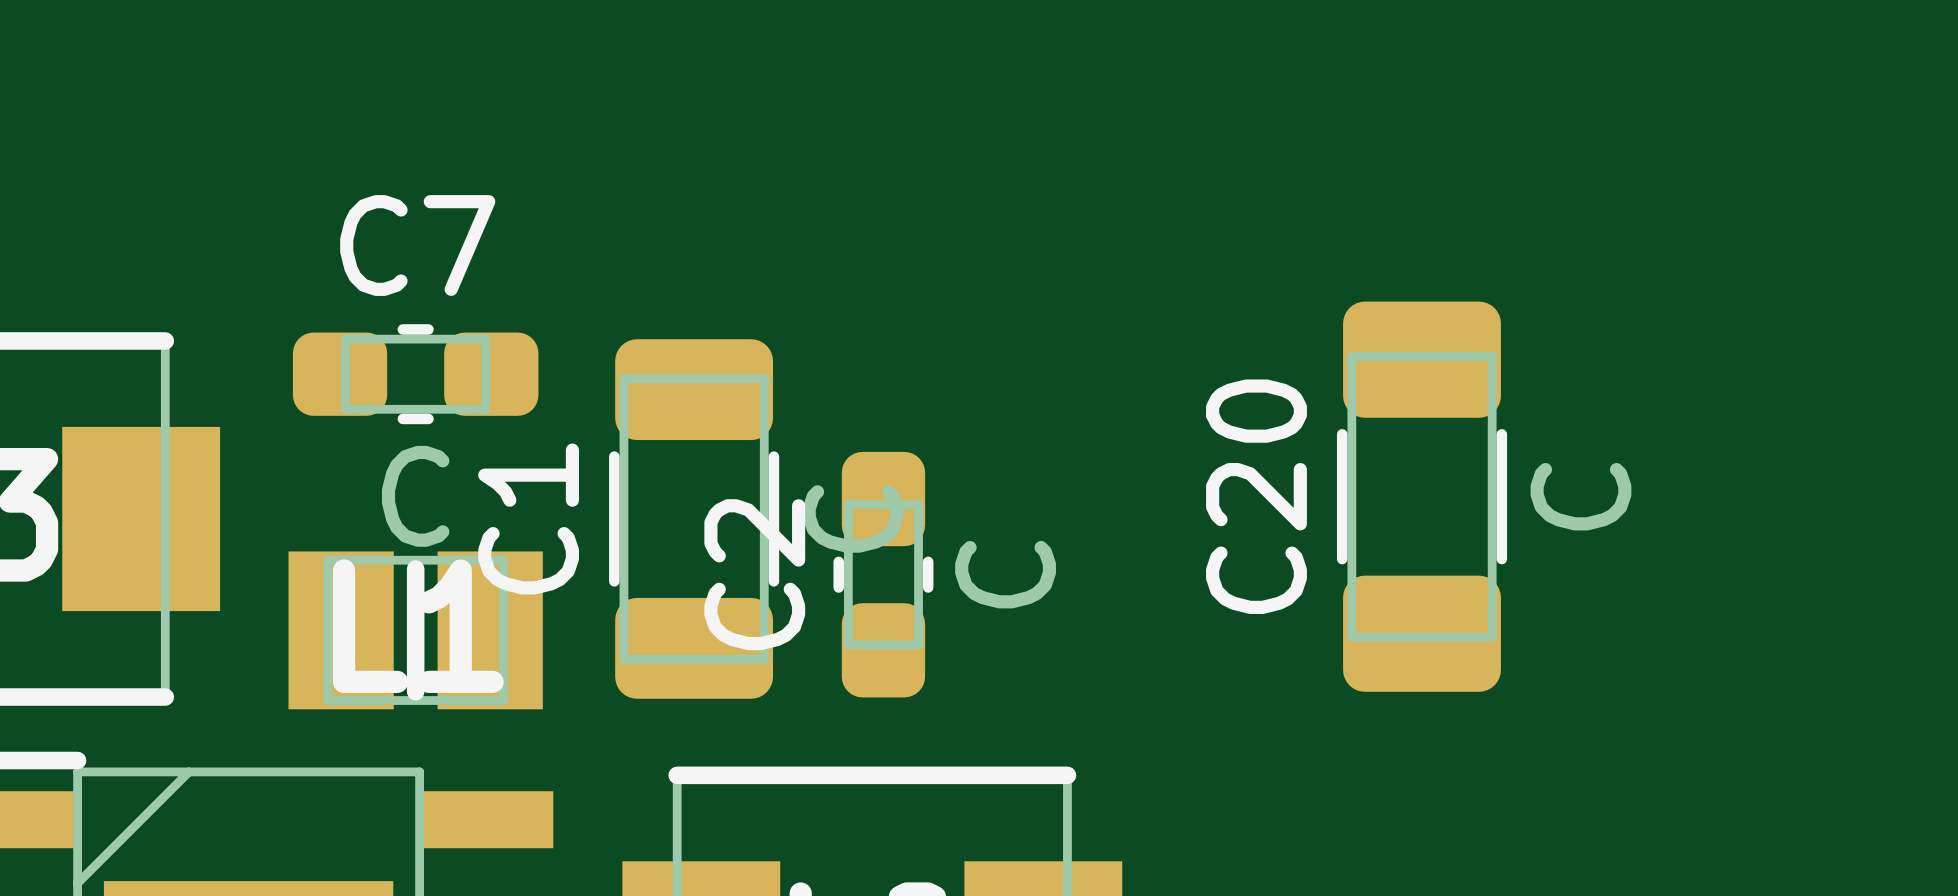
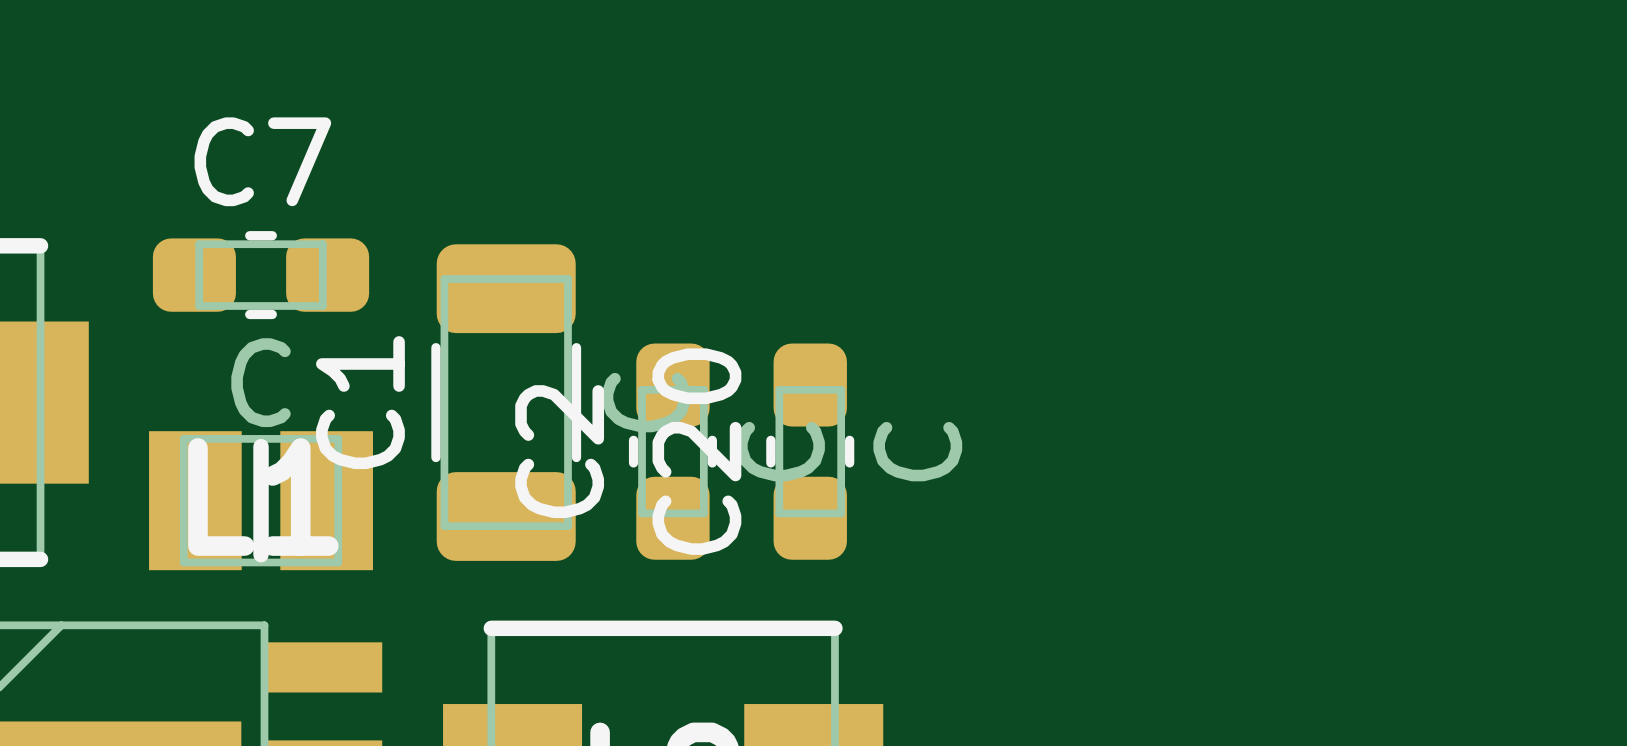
C20 footprint: [1336, 301, 1508, 692] -> [766, 343, 855, 560]

